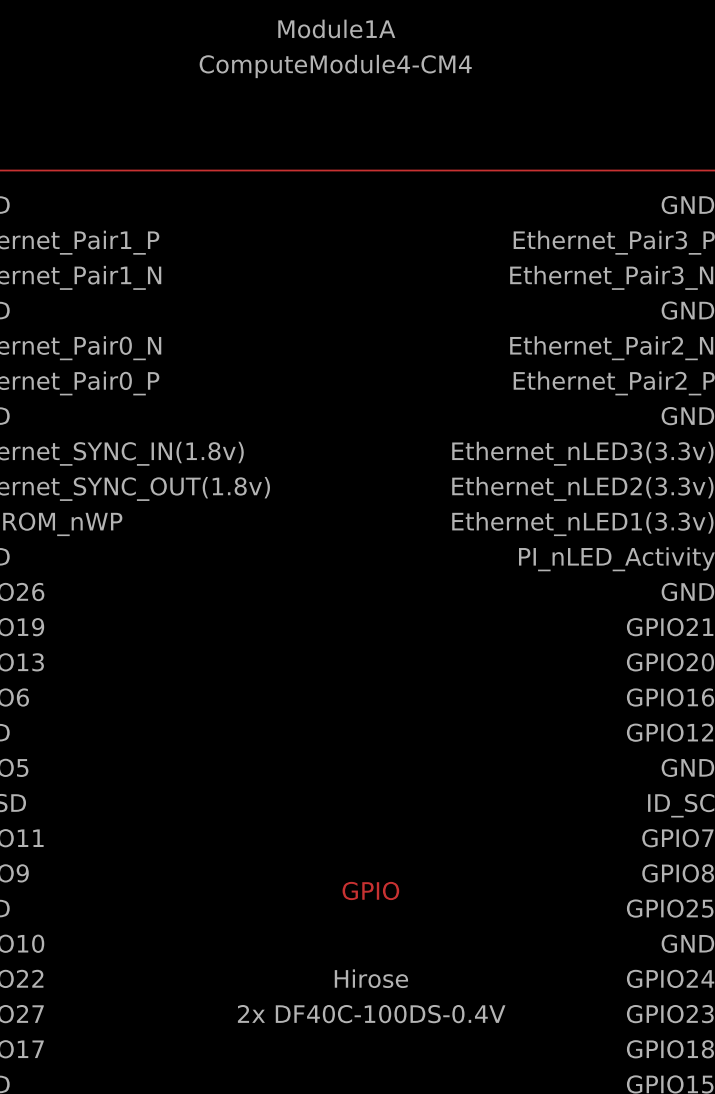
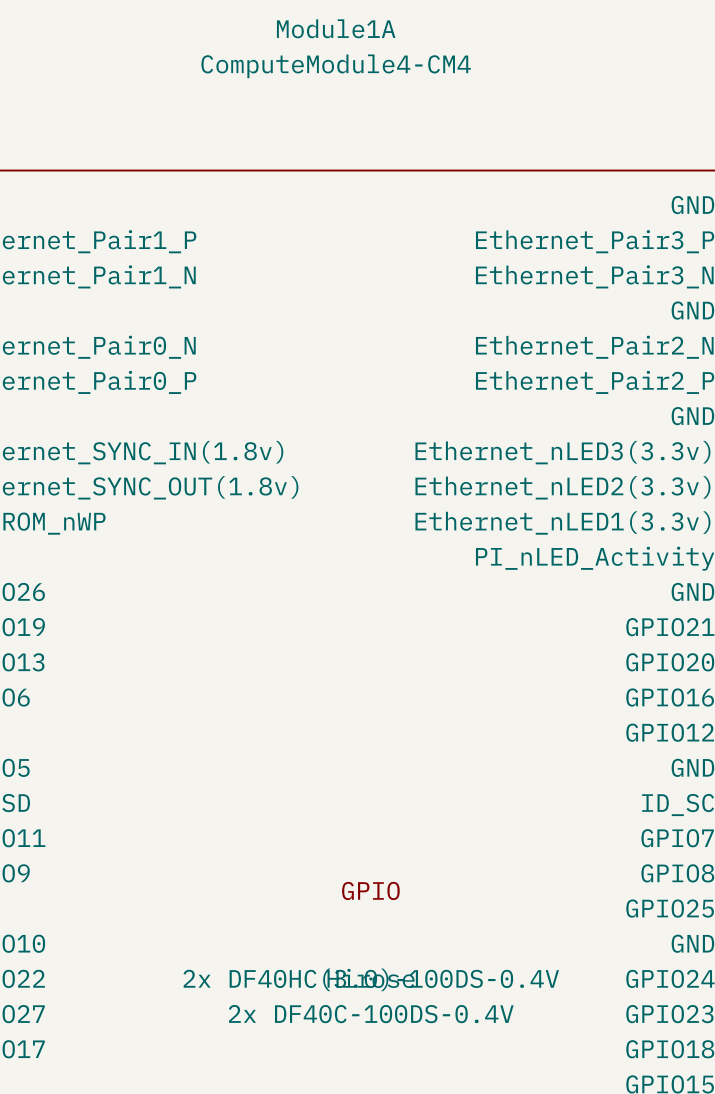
Module1A text: none -> 2x DF40HC(3.0)-100DS-0.4V (371, 979)

